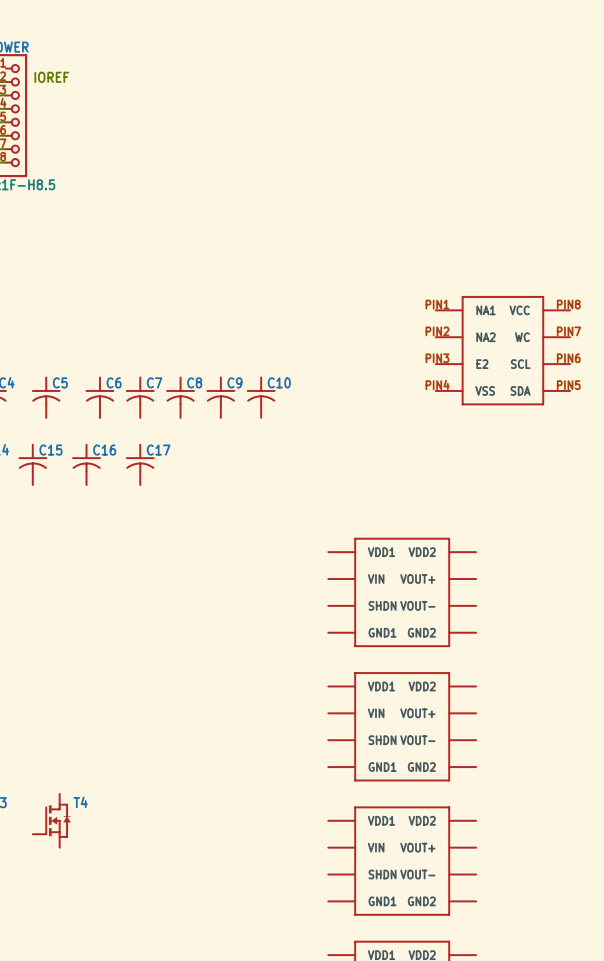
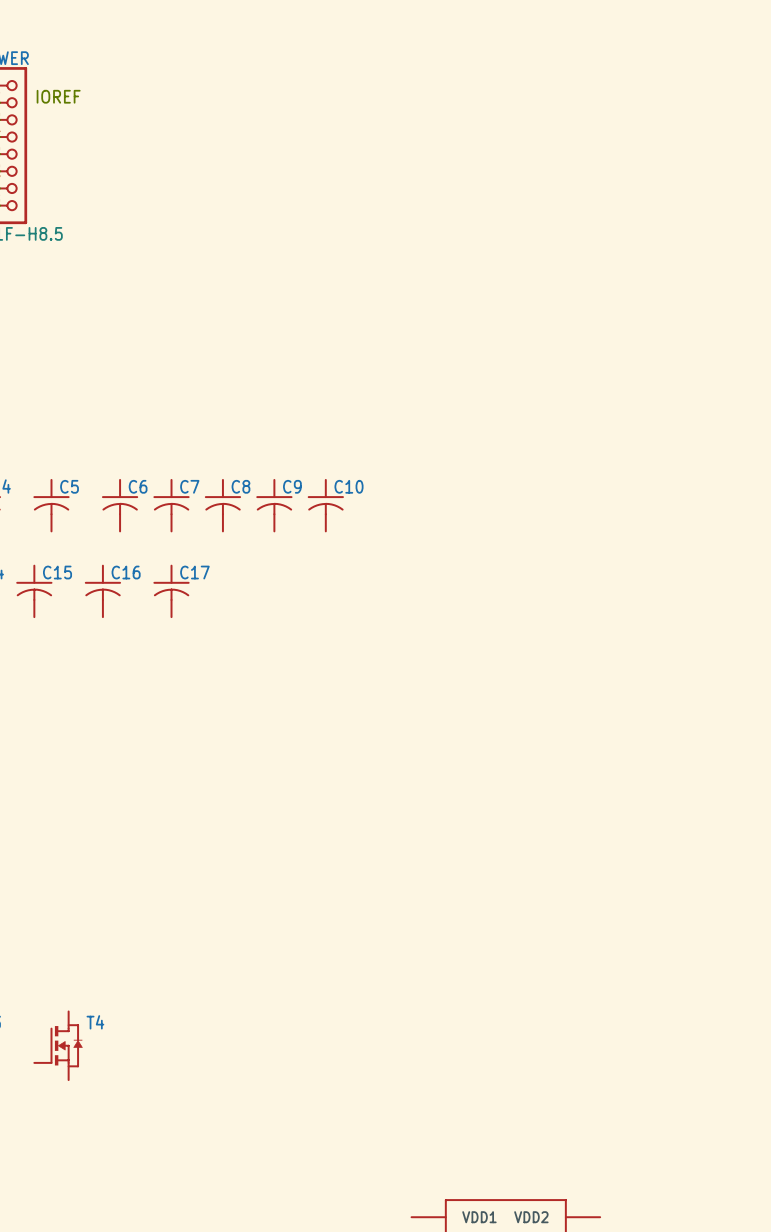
part: (502, 350) -> none
part: (402, 592) -> none
part: (402, 726) -> none
part: (402, 861) -> none

